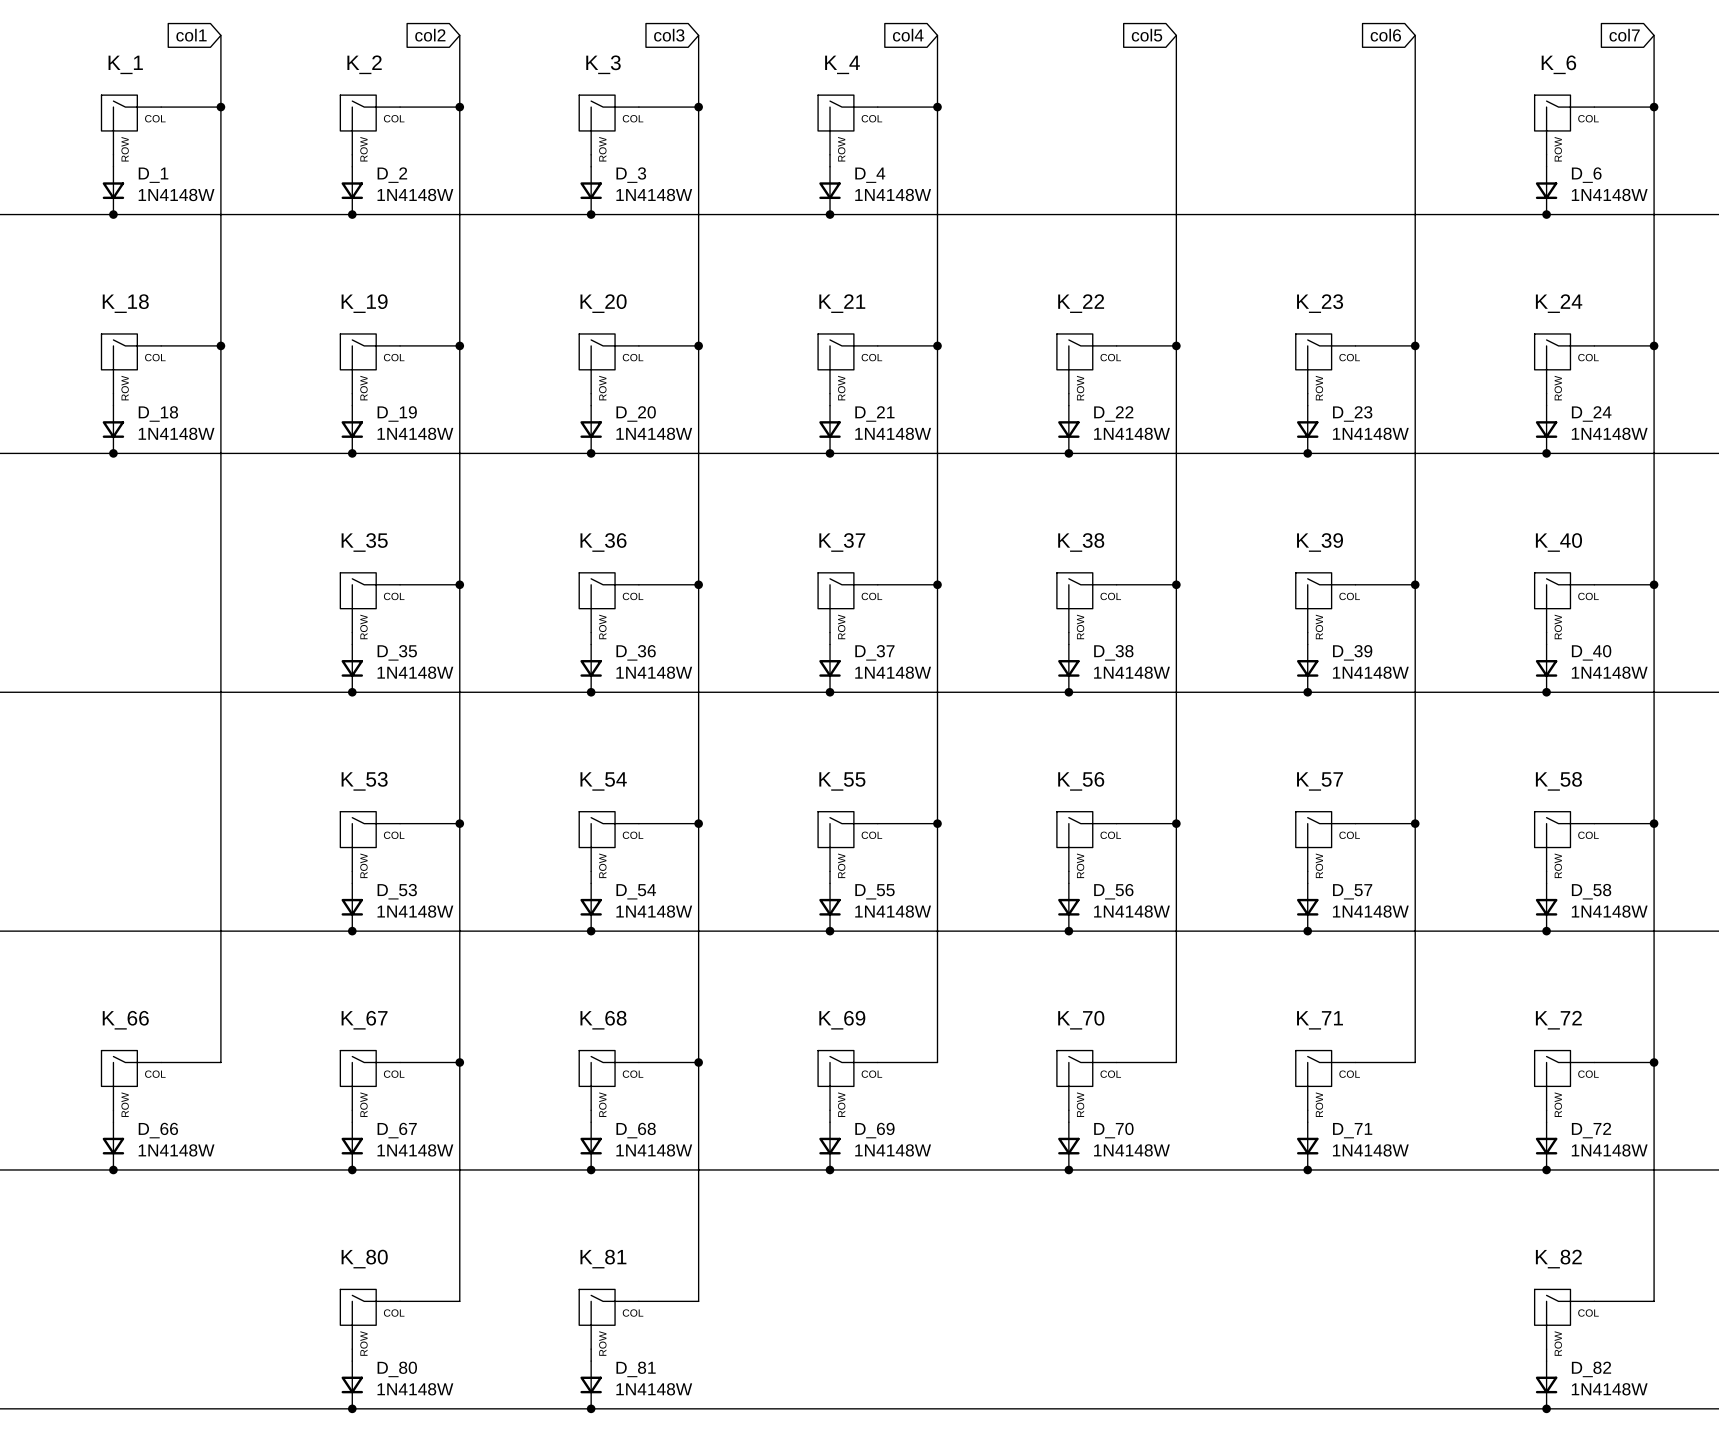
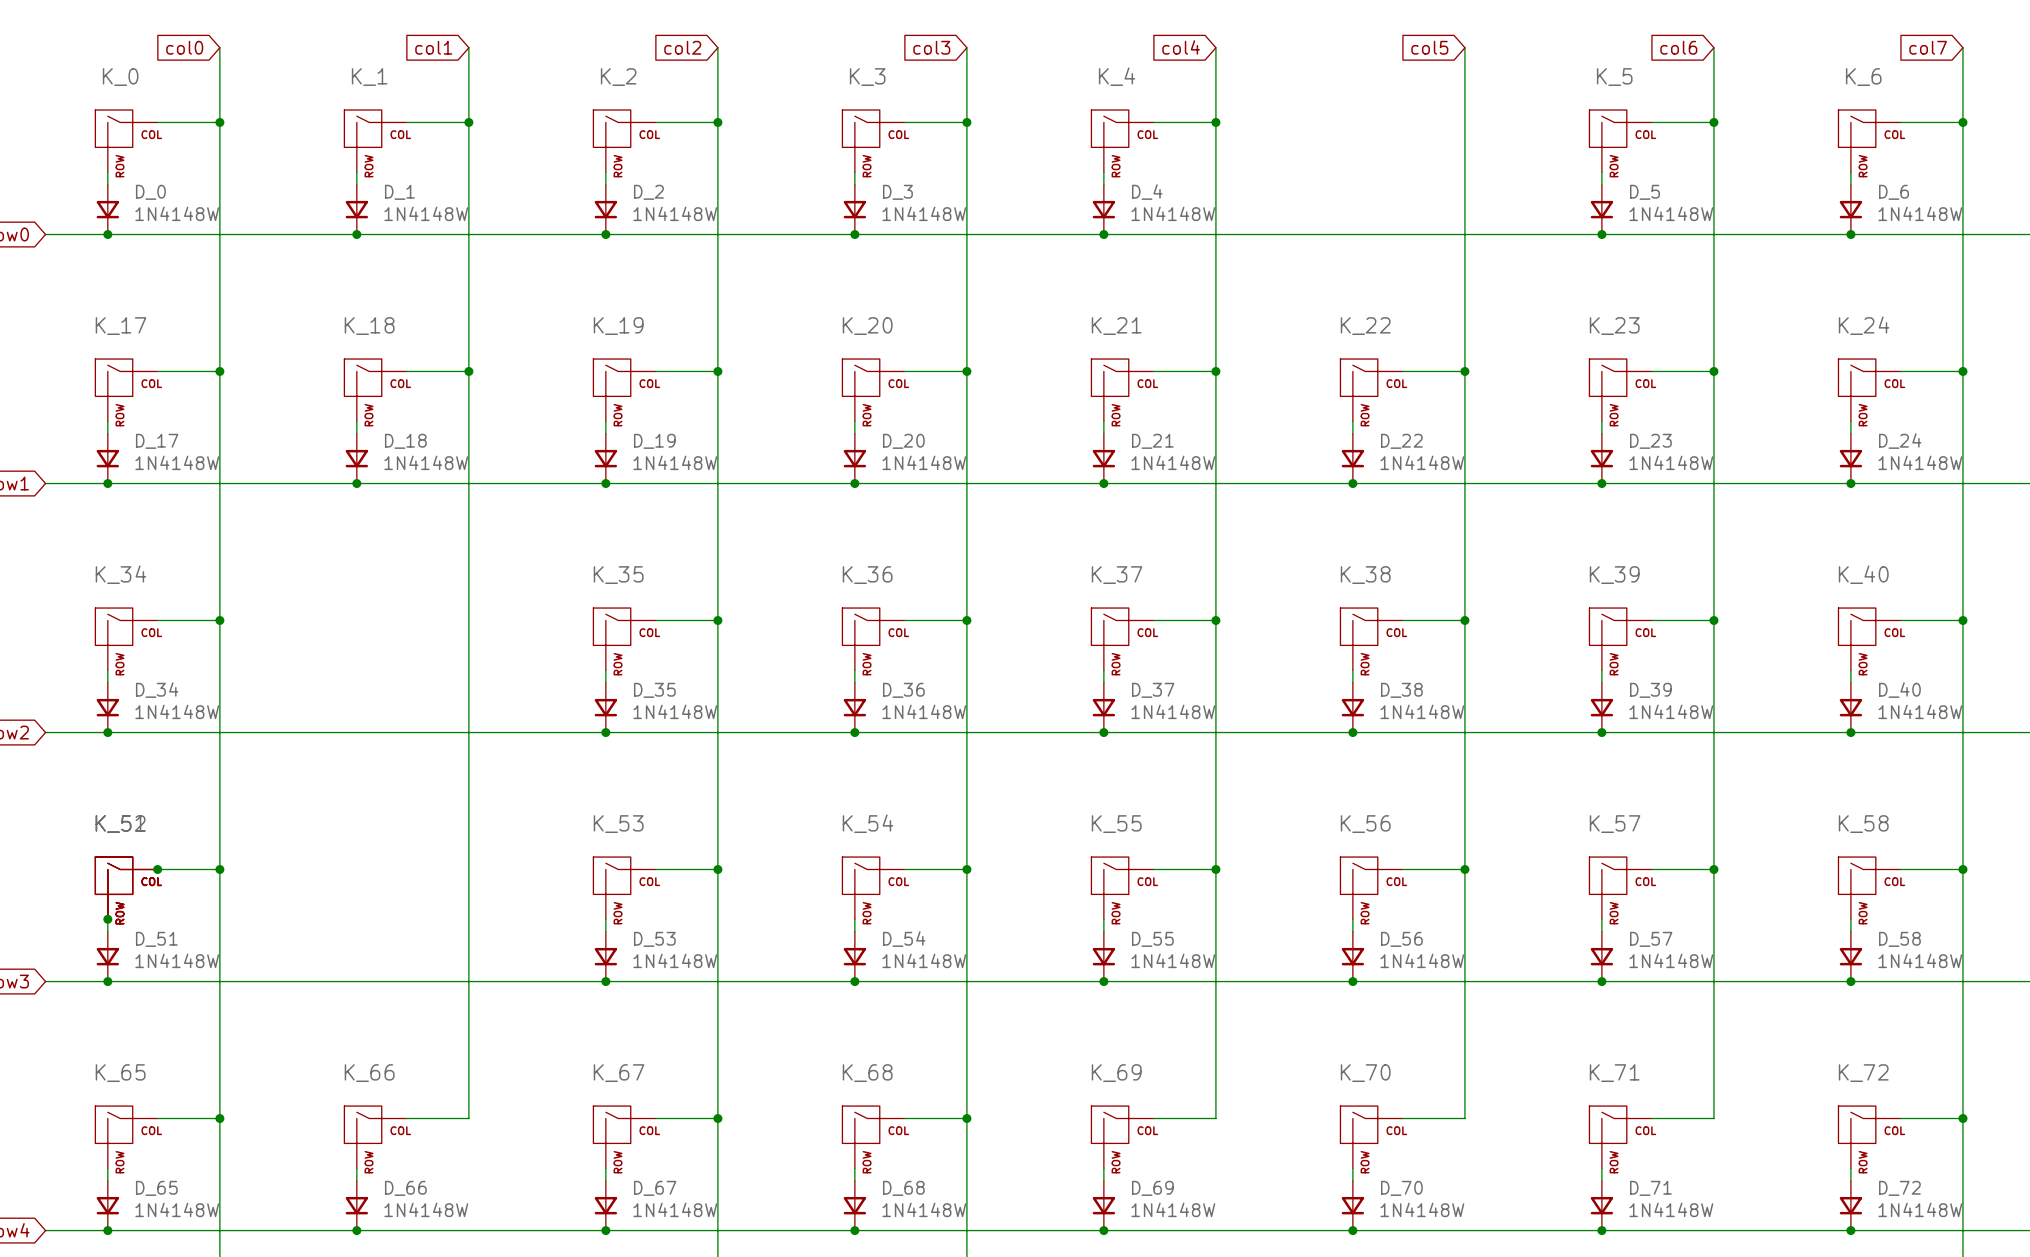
wire: none -> (1651, 122) (1713, 122)
junction: none -> (1713, 122)
K_5: none -> (1620, 141)
wire: none -> (1601, 172) (1601, 184)
D_5: none -> 1N4148W (1601, 209)
junction: none -> (1601, 234)

